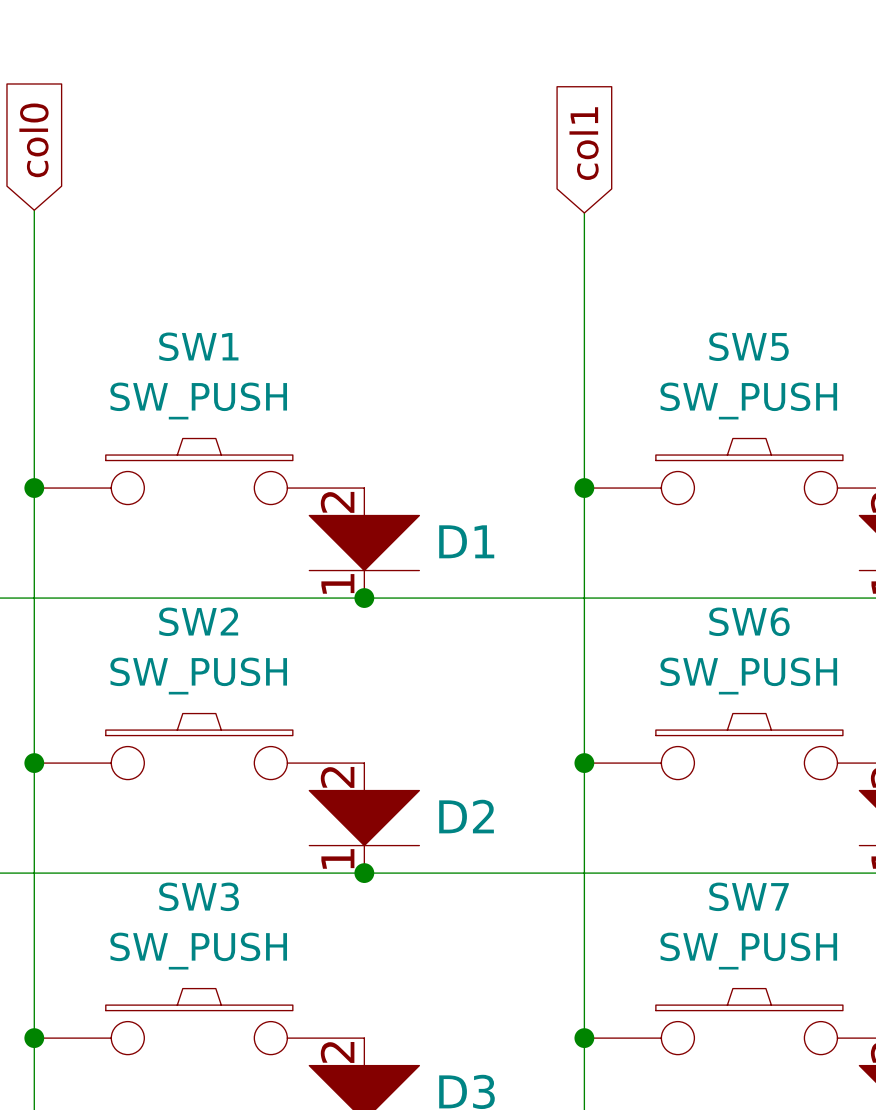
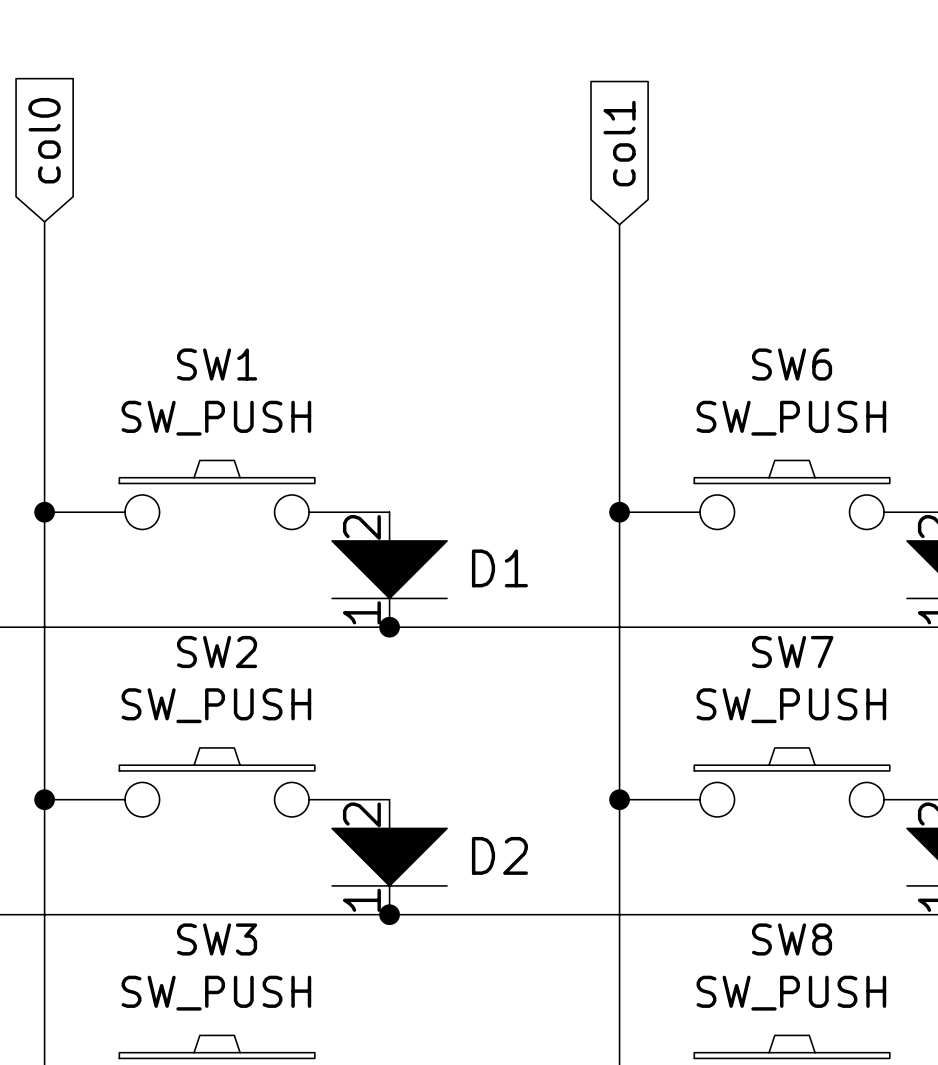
SW5 name: SW5 (749, 346) -> SW6 (792, 364)
SW6 name: SW6 (749, 621) -> SW7 (792, 652)
SW7 name: SW7 (749, 896) -> SW8 (792, 939)

